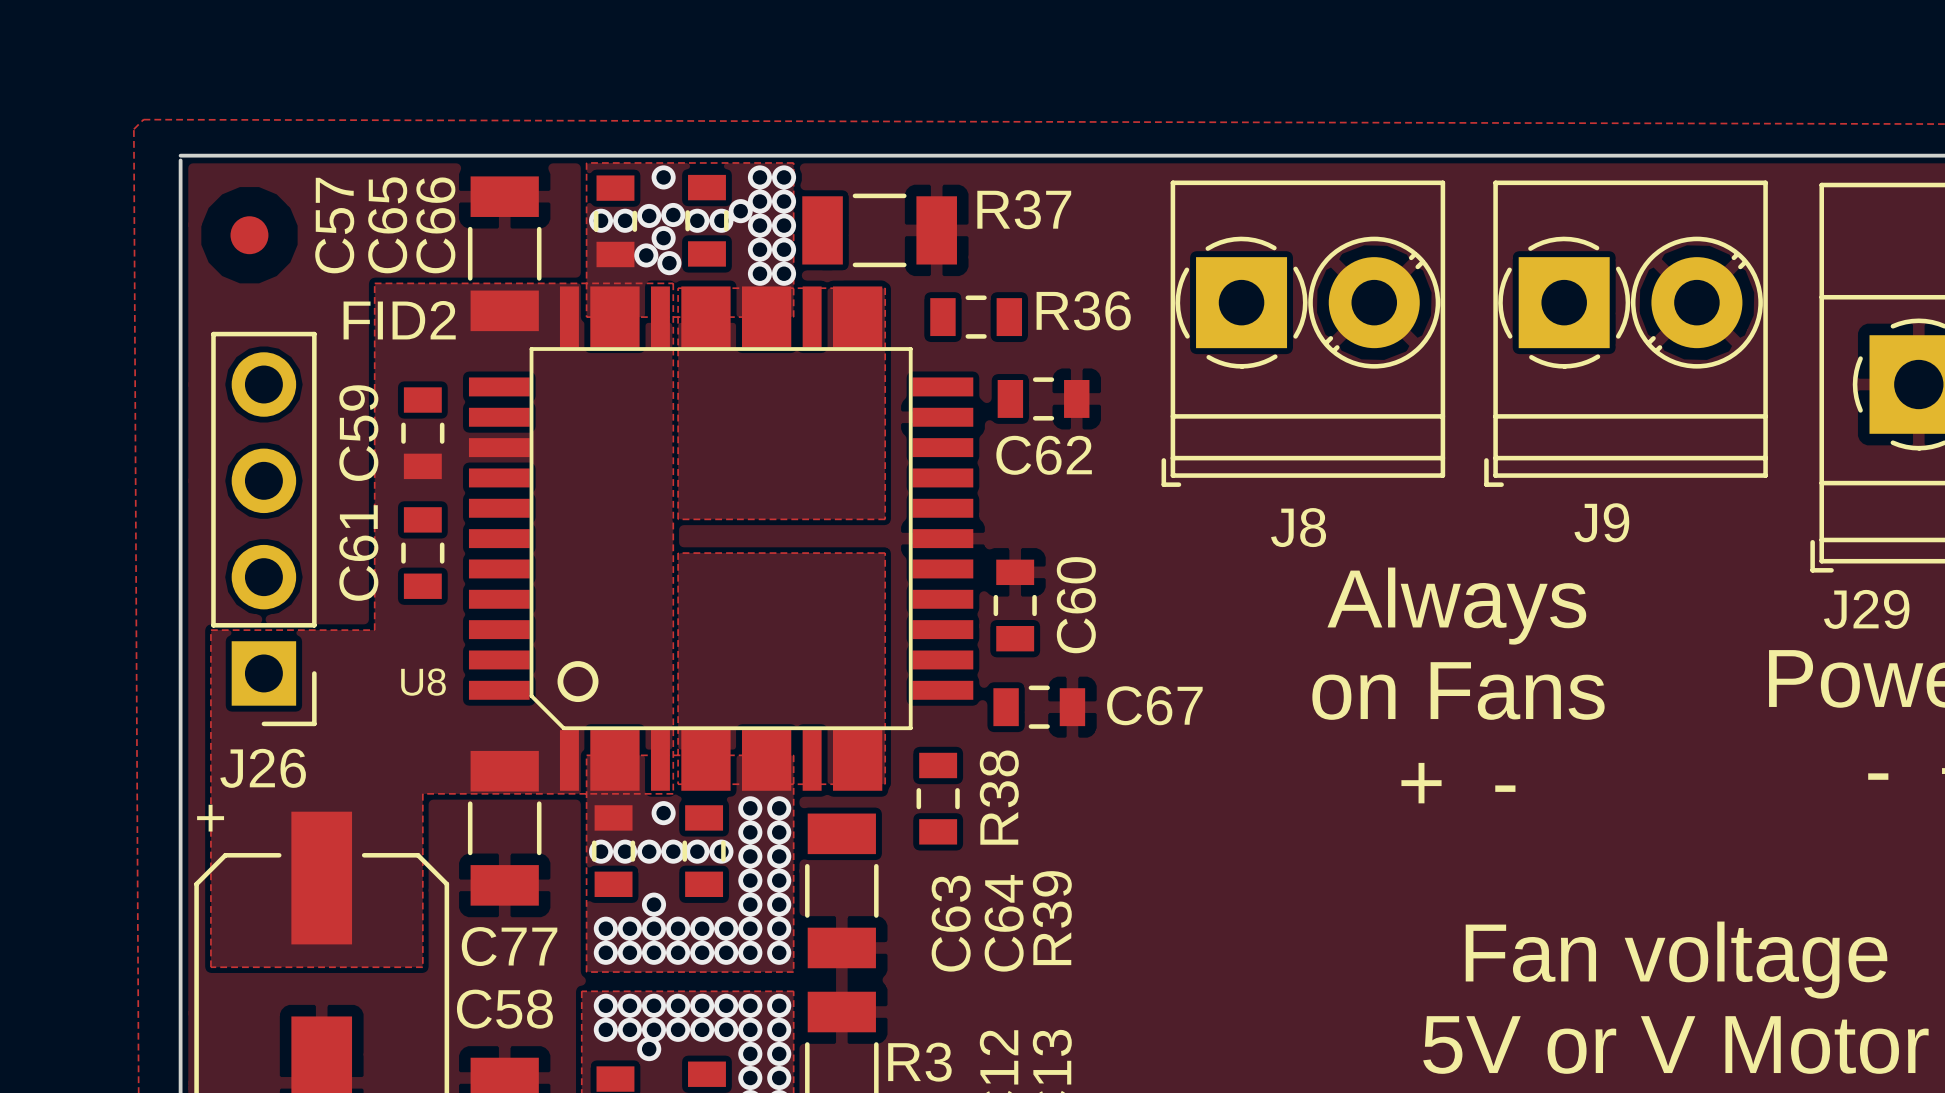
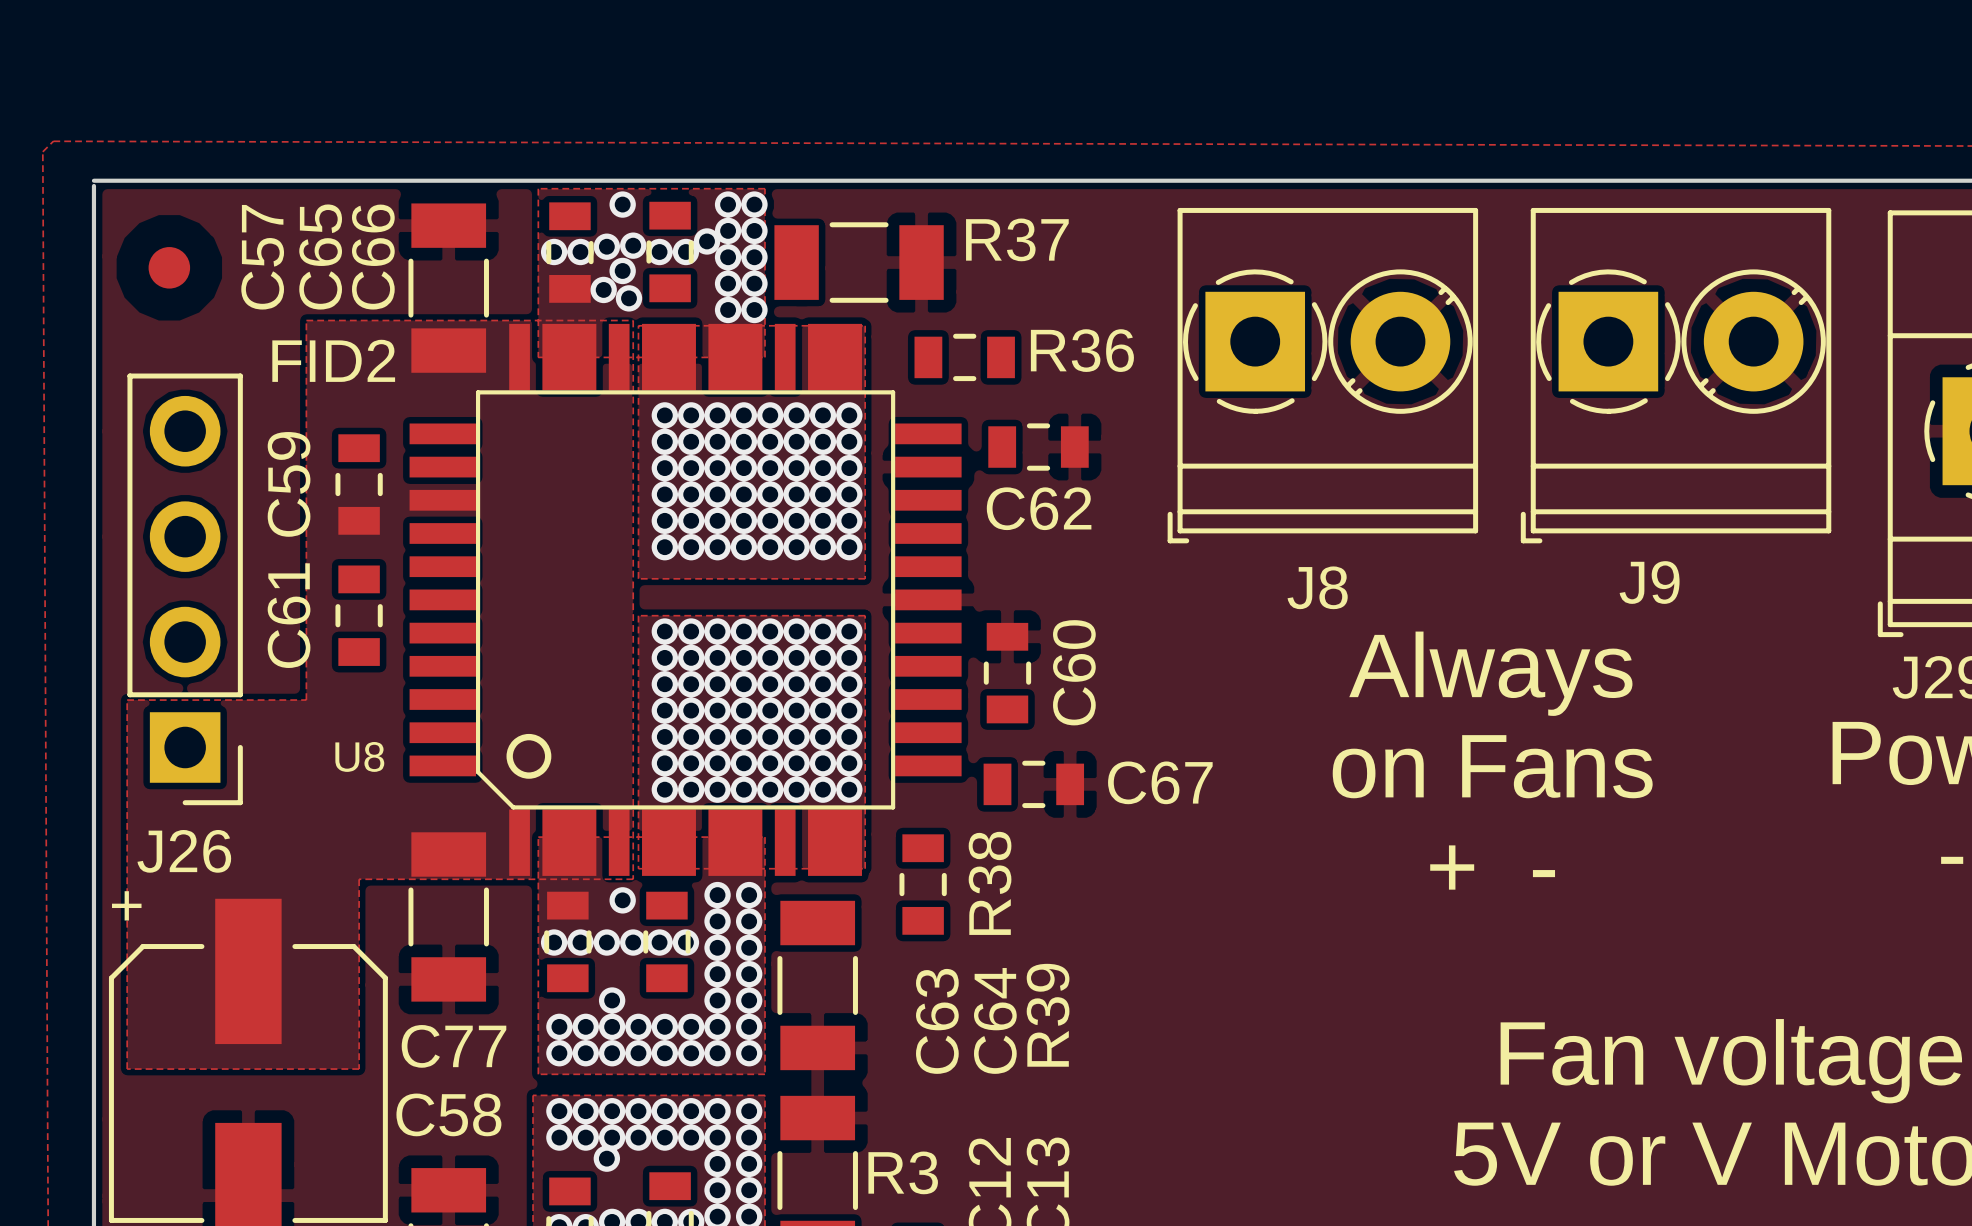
via: none -> (664, 415)
via: none -> (691, 415)
via: none -> (717, 415)
via: none -> (743, 415)
via: none -> (770, 415)
via: none -> (796, 415)
via: none -> (822, 415)
via: none -> (849, 415)
via: none -> (664, 441)
via: none -> (691, 441)
via: none -> (717, 441)
via: none -> (743, 441)
via: none -> (770, 441)
via: none -> (796, 441)
via: none -> (822, 441)
via: none -> (849, 441)
via: none -> (664, 468)
via: none -> (691, 468)
via: none -> (717, 468)
via: none -> (743, 468)
via: none -> (770, 468)
via: none -> (796, 468)
via: none -> (822, 468)
via: none -> (849, 468)
via: none -> (664, 494)
via: none -> (691, 494)
via: none -> (717, 494)
via: none -> (743, 494)
via: none -> (770, 494)
via: none -> (796, 494)
via: none -> (822, 494)
via: none -> (849, 494)
via: none -> (664, 520)
via: none -> (691, 520)
via: none -> (717, 520)
via: none -> (743, 520)
via: none -> (770, 520)
via: none -> (796, 520)
via: none -> (822, 520)
via: none -> (849, 520)
via: none -> (664, 547)
via: none -> (691, 547)
via: none -> (717, 547)
via: none -> (743, 547)
via: none -> (770, 547)
via: none -> (796, 547)
via: none -> (822, 547)
via: none -> (849, 547)
via: none -> (664, 631)
via: none -> (691, 631)
via: none -> (717, 631)
via: none -> (743, 631)
via: none -> (770, 631)
via: none -> (796, 631)
via: none -> (822, 631)
via: none -> (849, 631)
via: none -> (664, 657)
via: none -> (691, 657)
via: none -> (717, 657)
via: none -> (743, 657)
via: none -> (770, 657)
via: none -> (796, 657)
via: none -> (822, 657)
via: none -> (849, 657)
via: none -> (664, 684)
via: none -> (691, 684)
via: none -> (717, 684)
via: none -> (743, 684)
via: none -> (770, 684)
via: none -> (796, 684)
via: none -> (822, 684)
via: none -> (849, 684)
via: none -> (664, 710)
via: none -> (691, 710)
via: none -> (717, 710)
via: none -> (743, 710)
via: none -> (770, 710)
via: none -> (796, 710)
via: none -> (822, 710)
via: none -> (849, 710)
via: none -> (664, 736)
via: none -> (691, 736)
via: none -> (717, 736)
via: none -> (743, 736)
via: none -> (770, 736)
via: none -> (796, 736)
via: none -> (822, 736)
via: none -> (849, 736)
via: none -> (664, 763)
via: none -> (691, 763)
via: none -> (717, 763)
via: none -> (743, 763)
via: none -> (770, 763)
via: none -> (796, 763)
via: none -> (822, 763)
via: none -> (849, 763)
via: none -> (664, 789)
via: none -> (691, 789)
via: none -> (717, 789)
via: none -> (743, 789)
via: none -> (770, 789)
via: none -> (796, 789)
via: none -> (822, 789)
via: none -> (849, 789)

